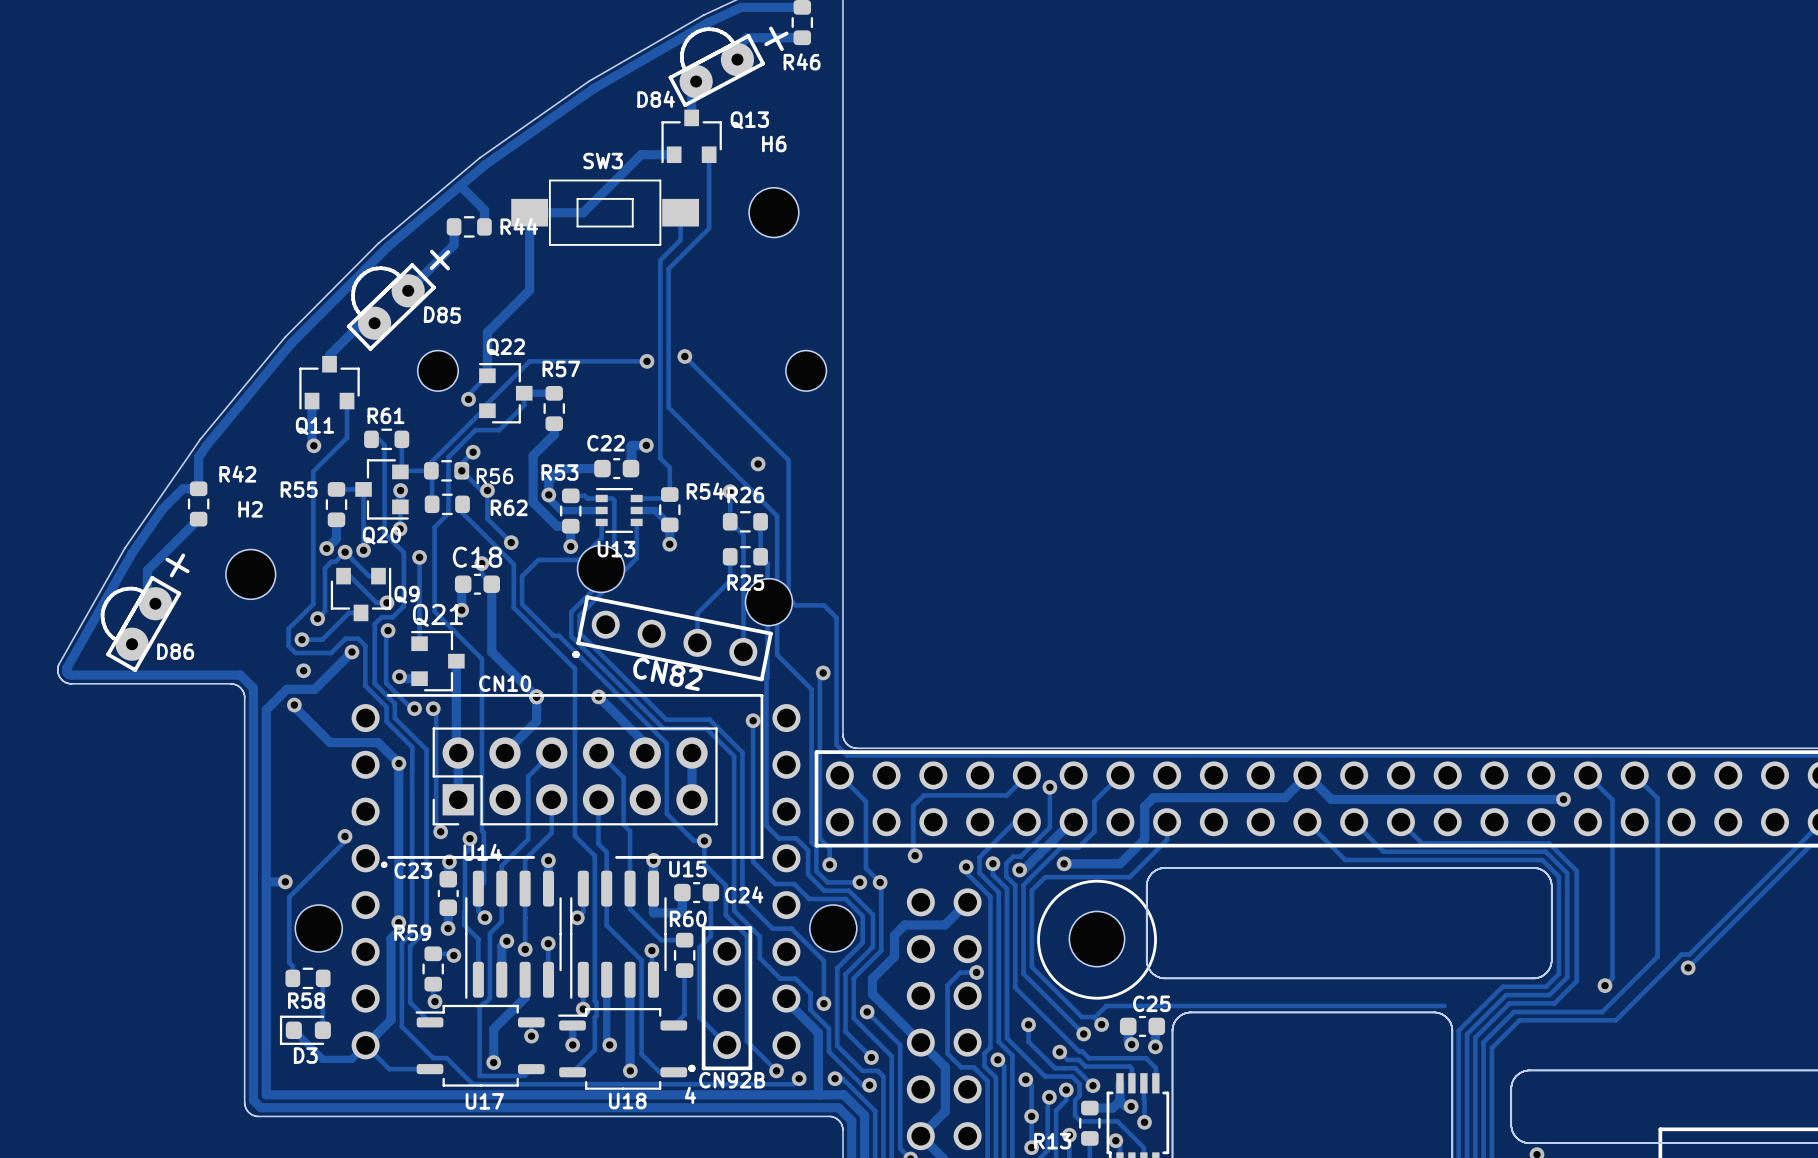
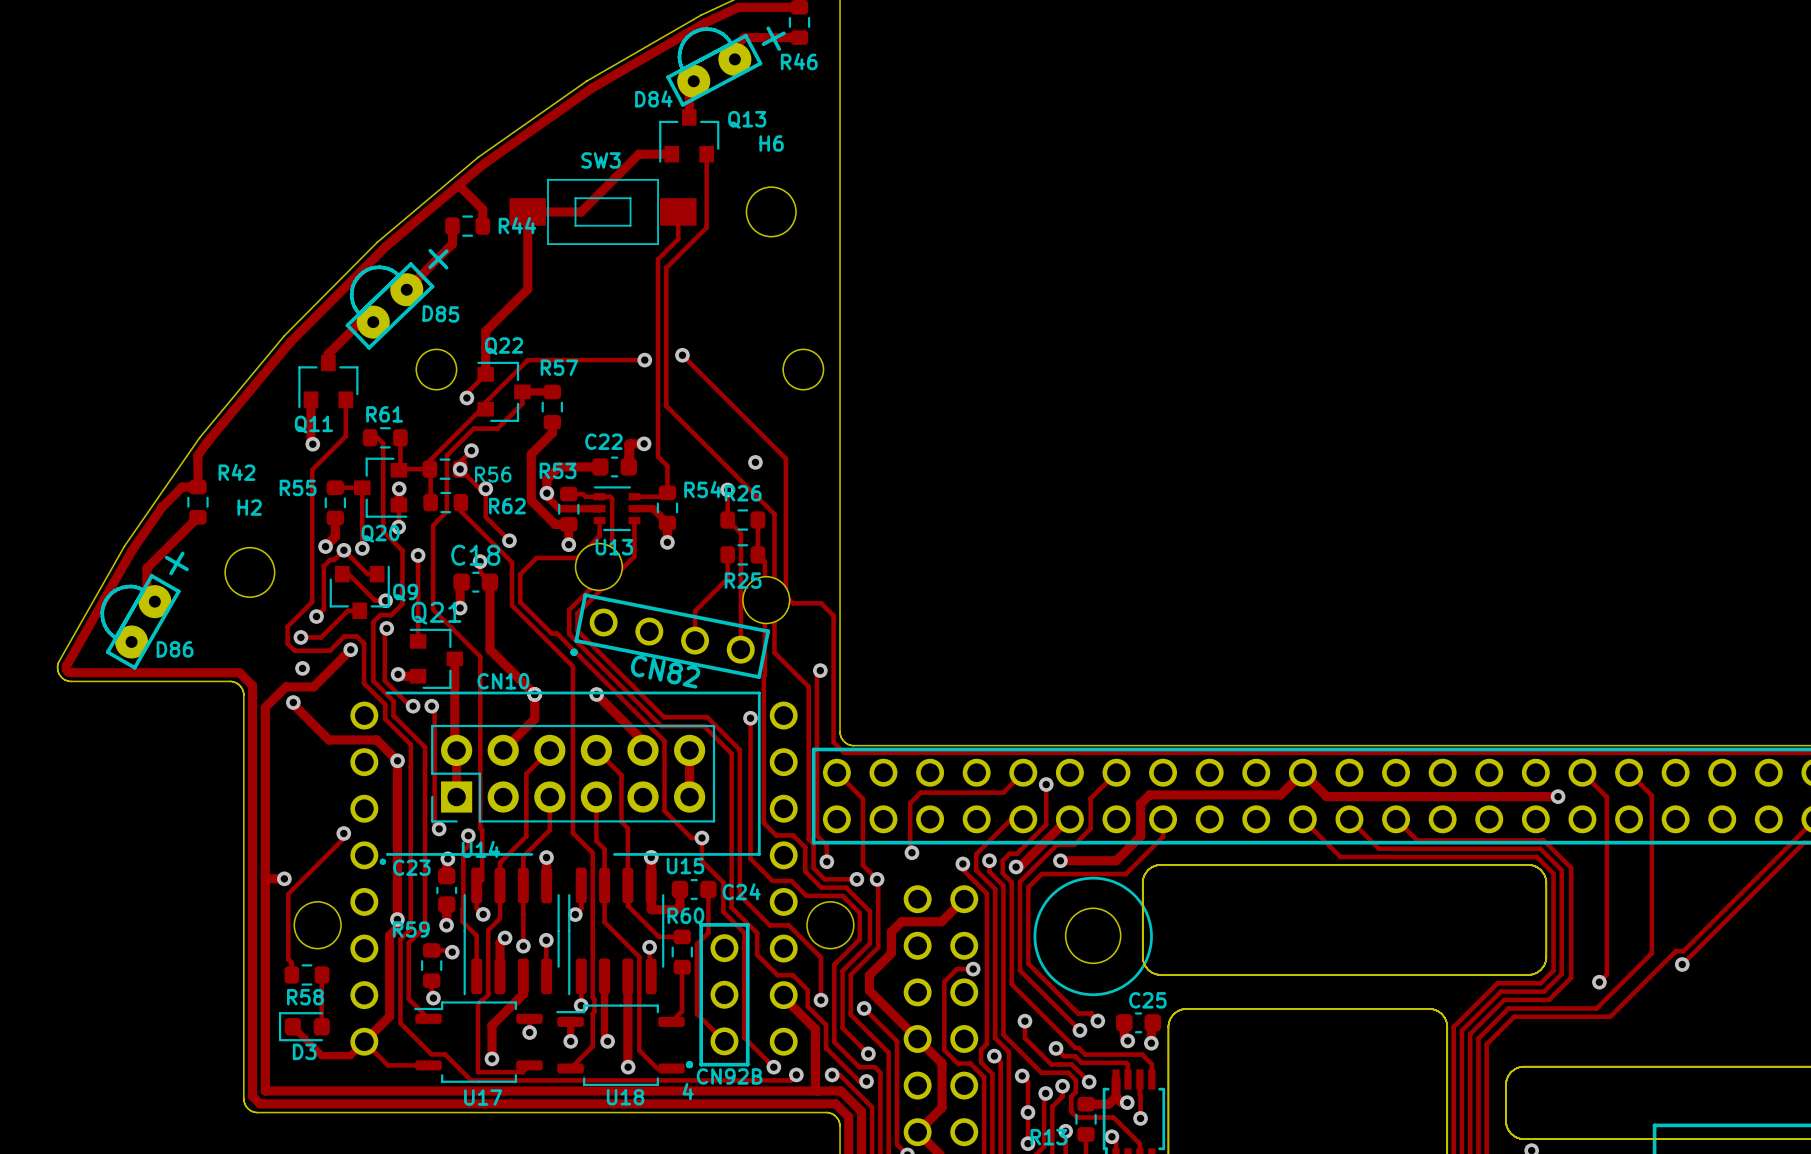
track: (1444, 1005) (1106, 1005) (1095, 1017) -> none

